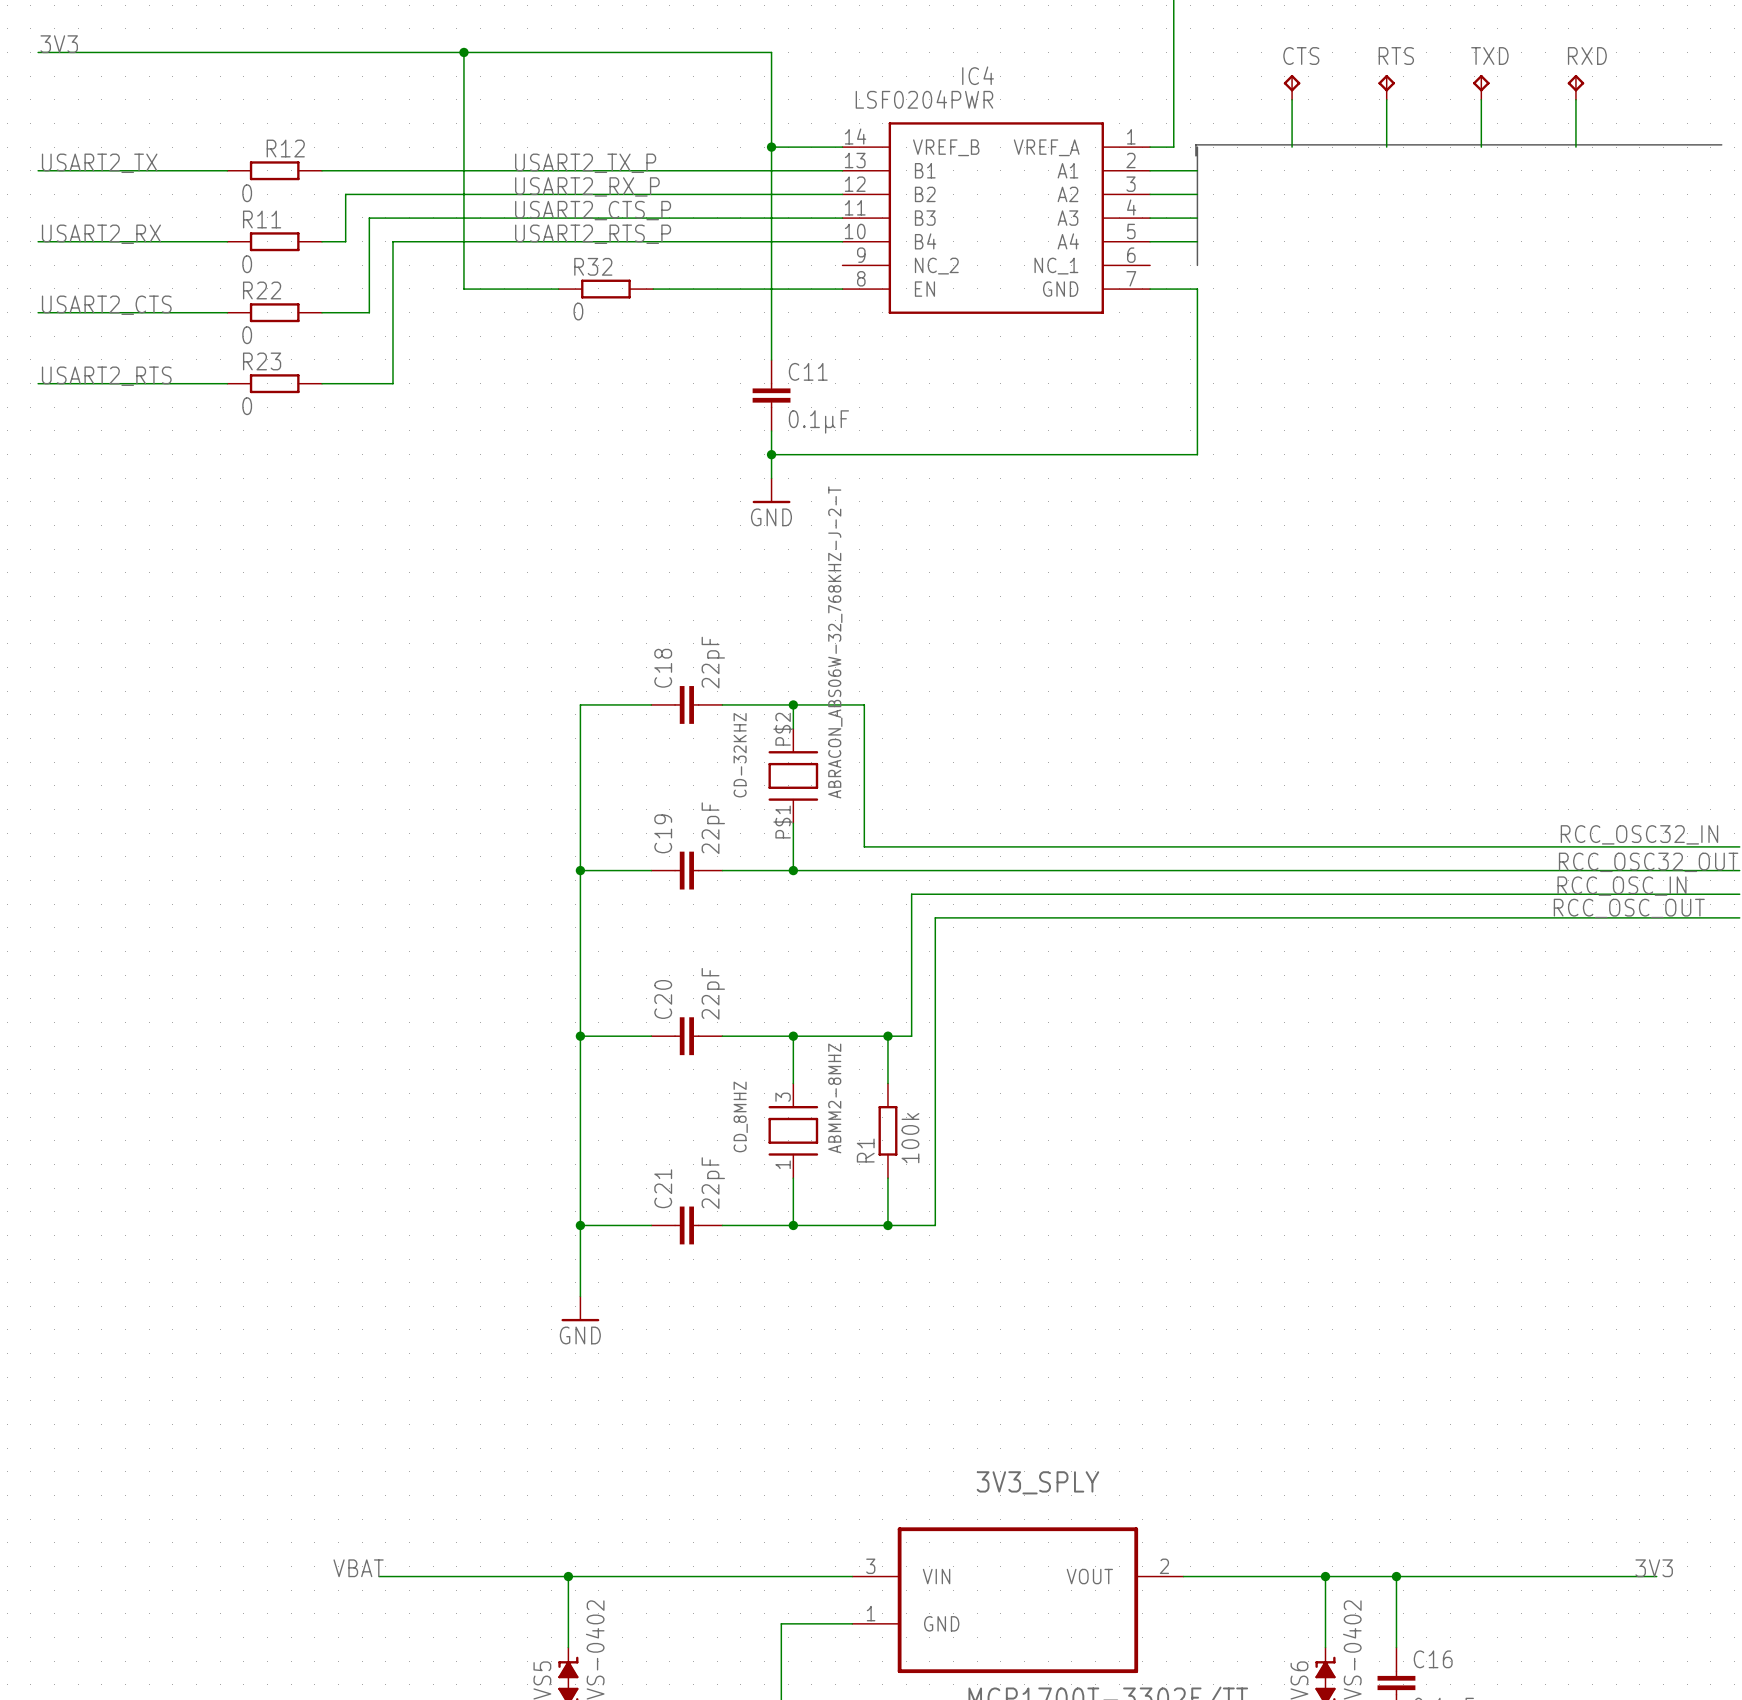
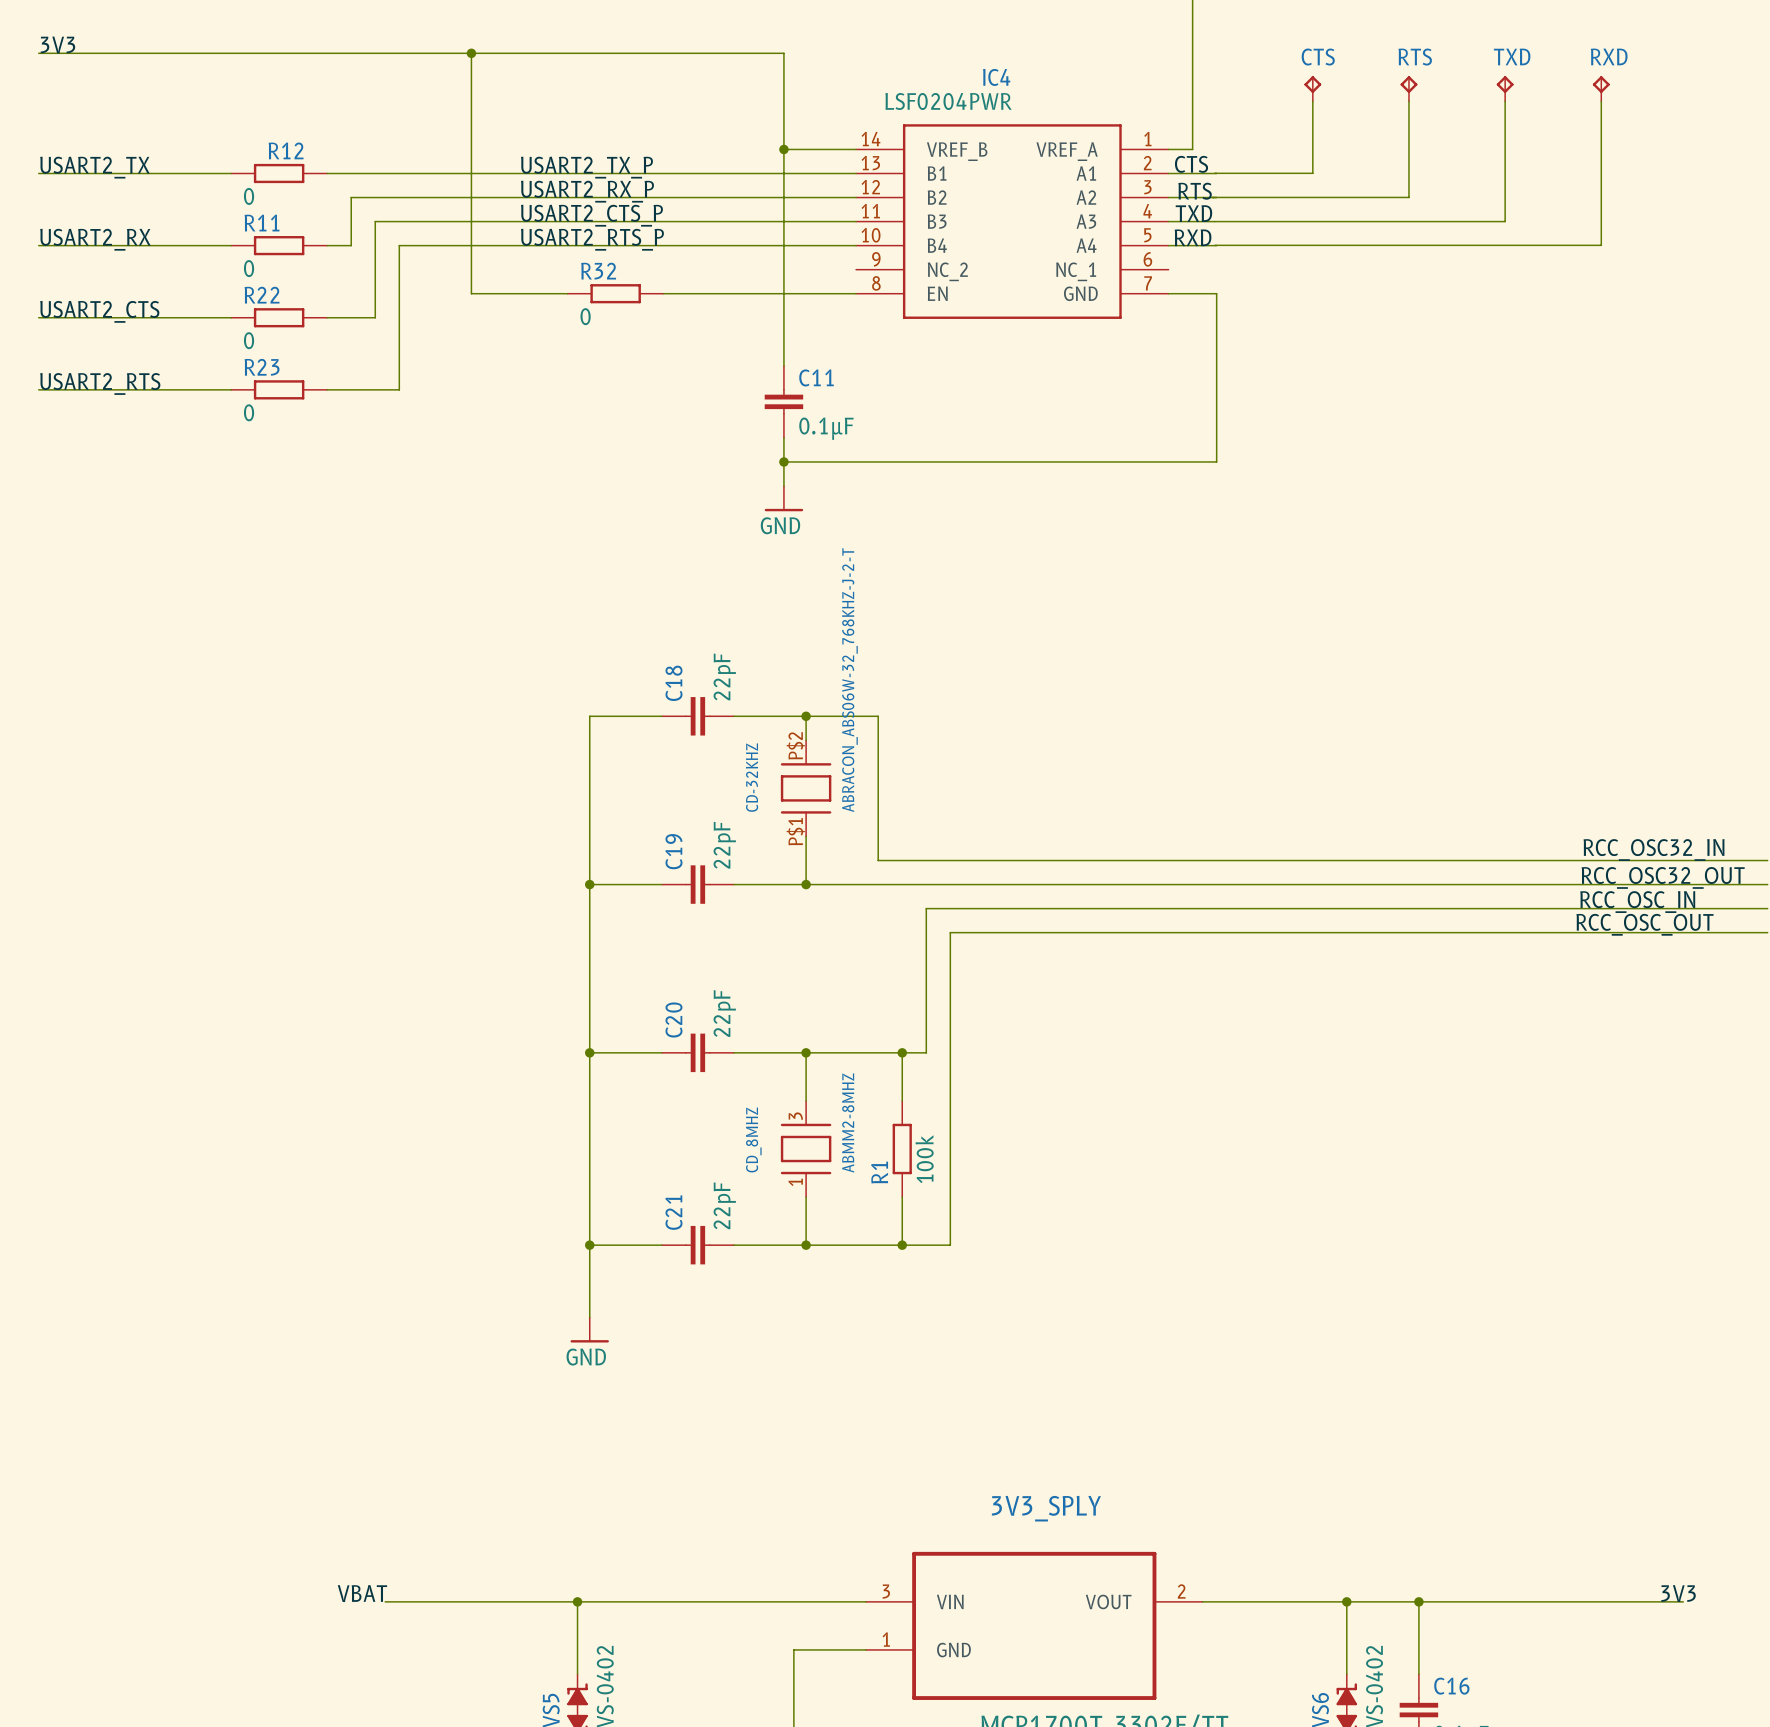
bus: (1721, 144) (1195, 144) (1195, 155) -> none
bus: (1197, 147) (1197, 265) -> none
wire: none -> (1312, 149) (1312, 173) (1214, 173)
wire: none -> (1408, 149) (1408, 197) (1212, 197)
wire: none -> (1505, 149) (1505, 221) (1216, 221)
wire: none -> (1601, 149) (1601, 245) (1215, 245)
label: none -> CTS (1191, 164)
label: none -> RTS (1195, 191)
label: none -> TXD (1193, 213)
label: none -> RXD (1193, 237)

